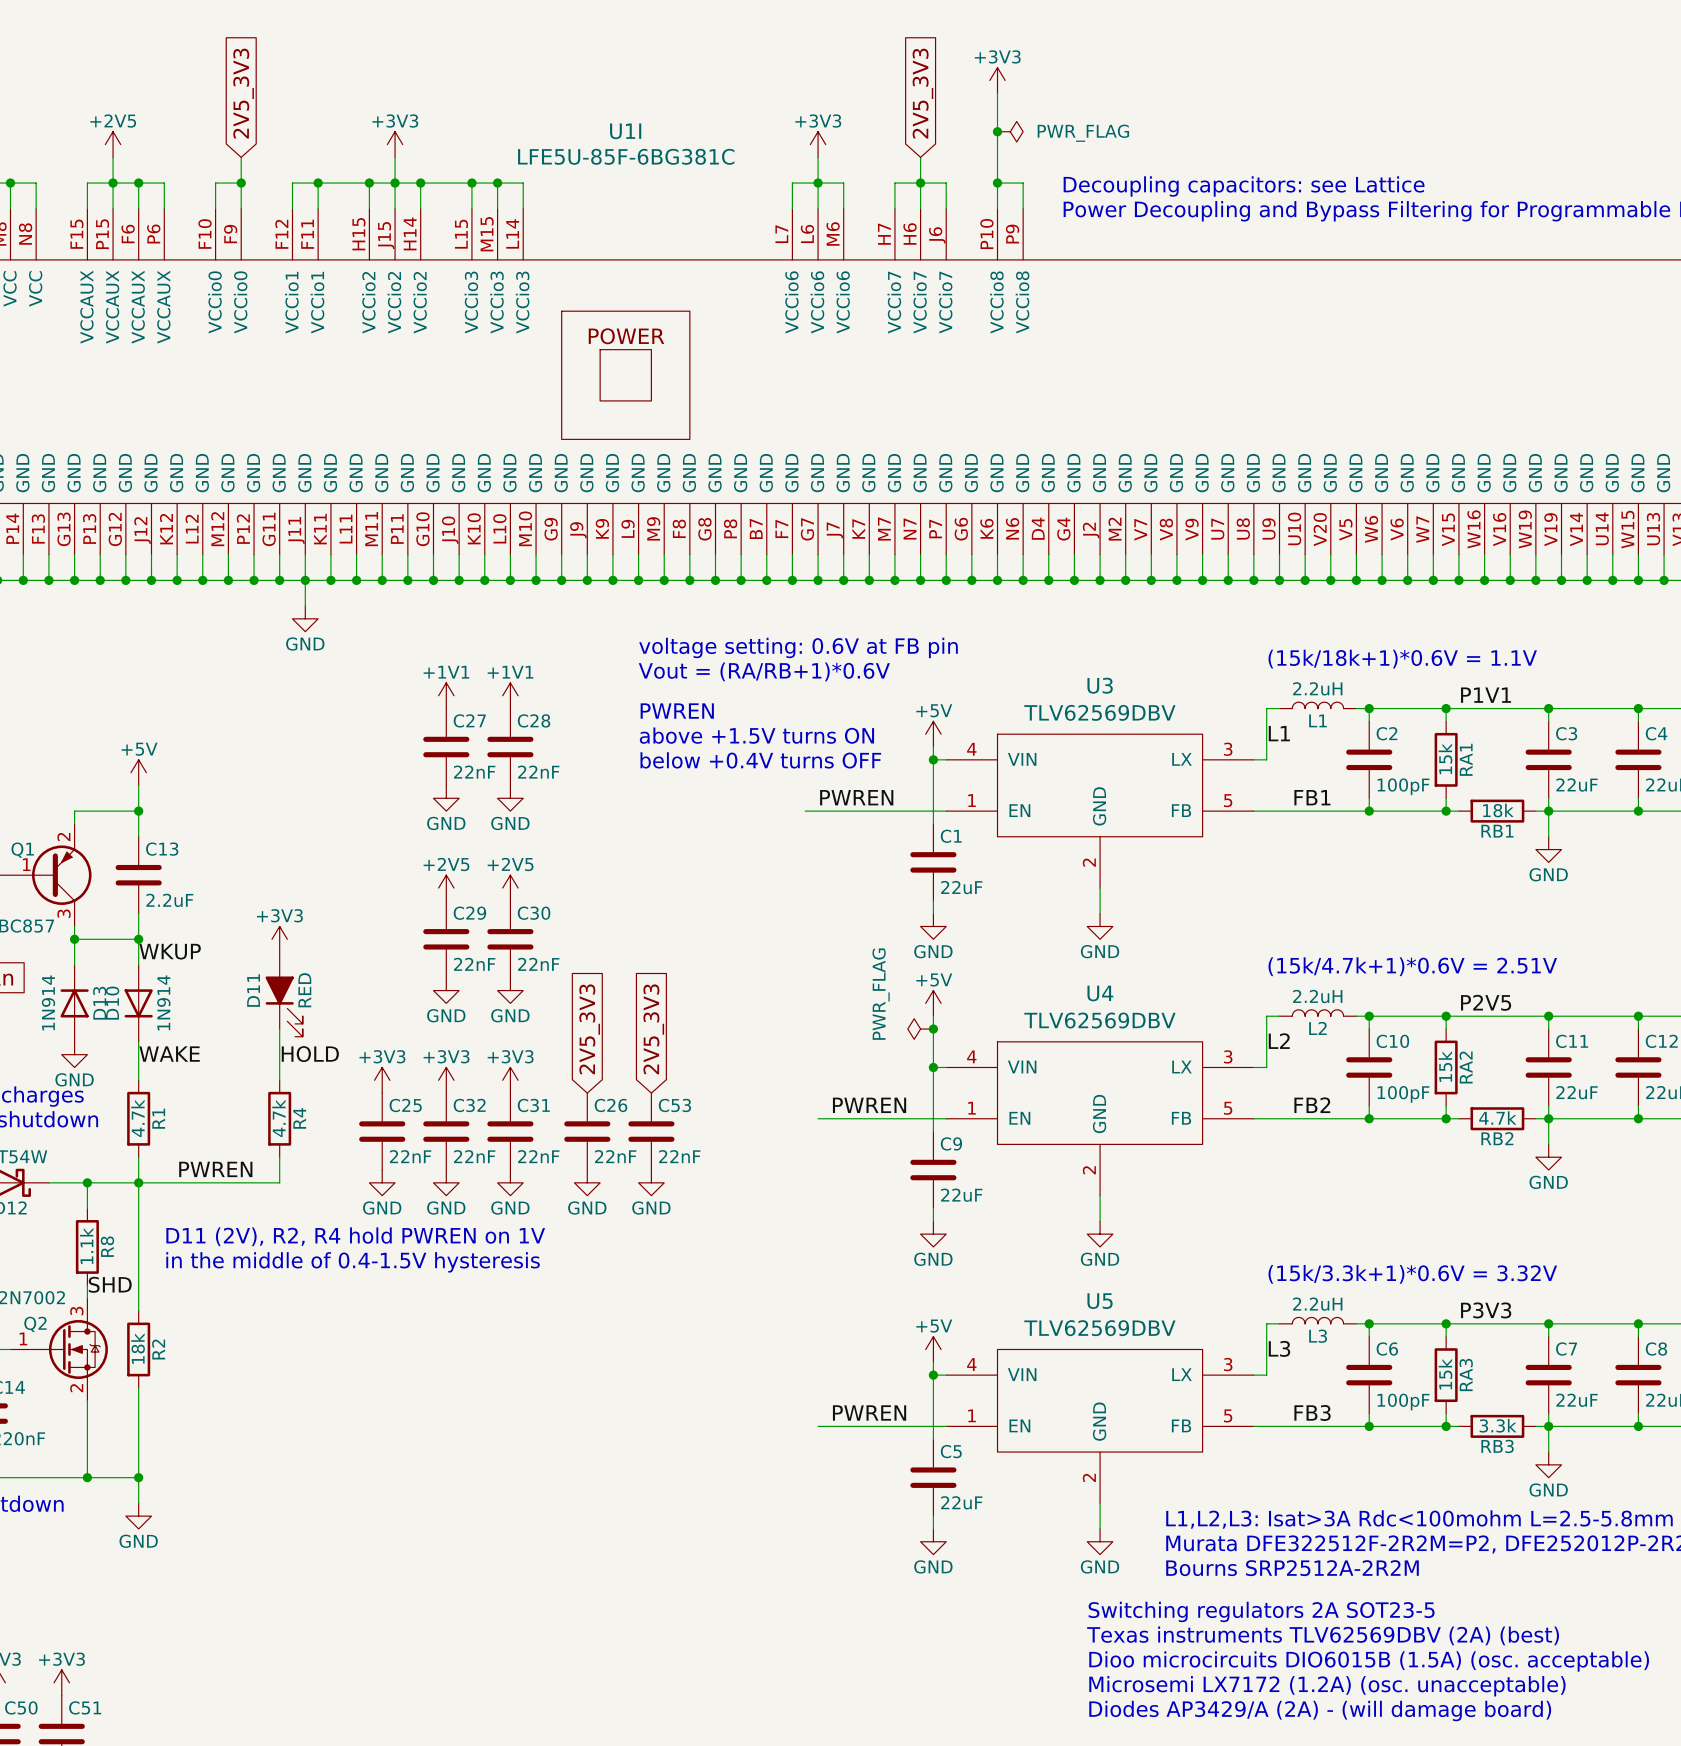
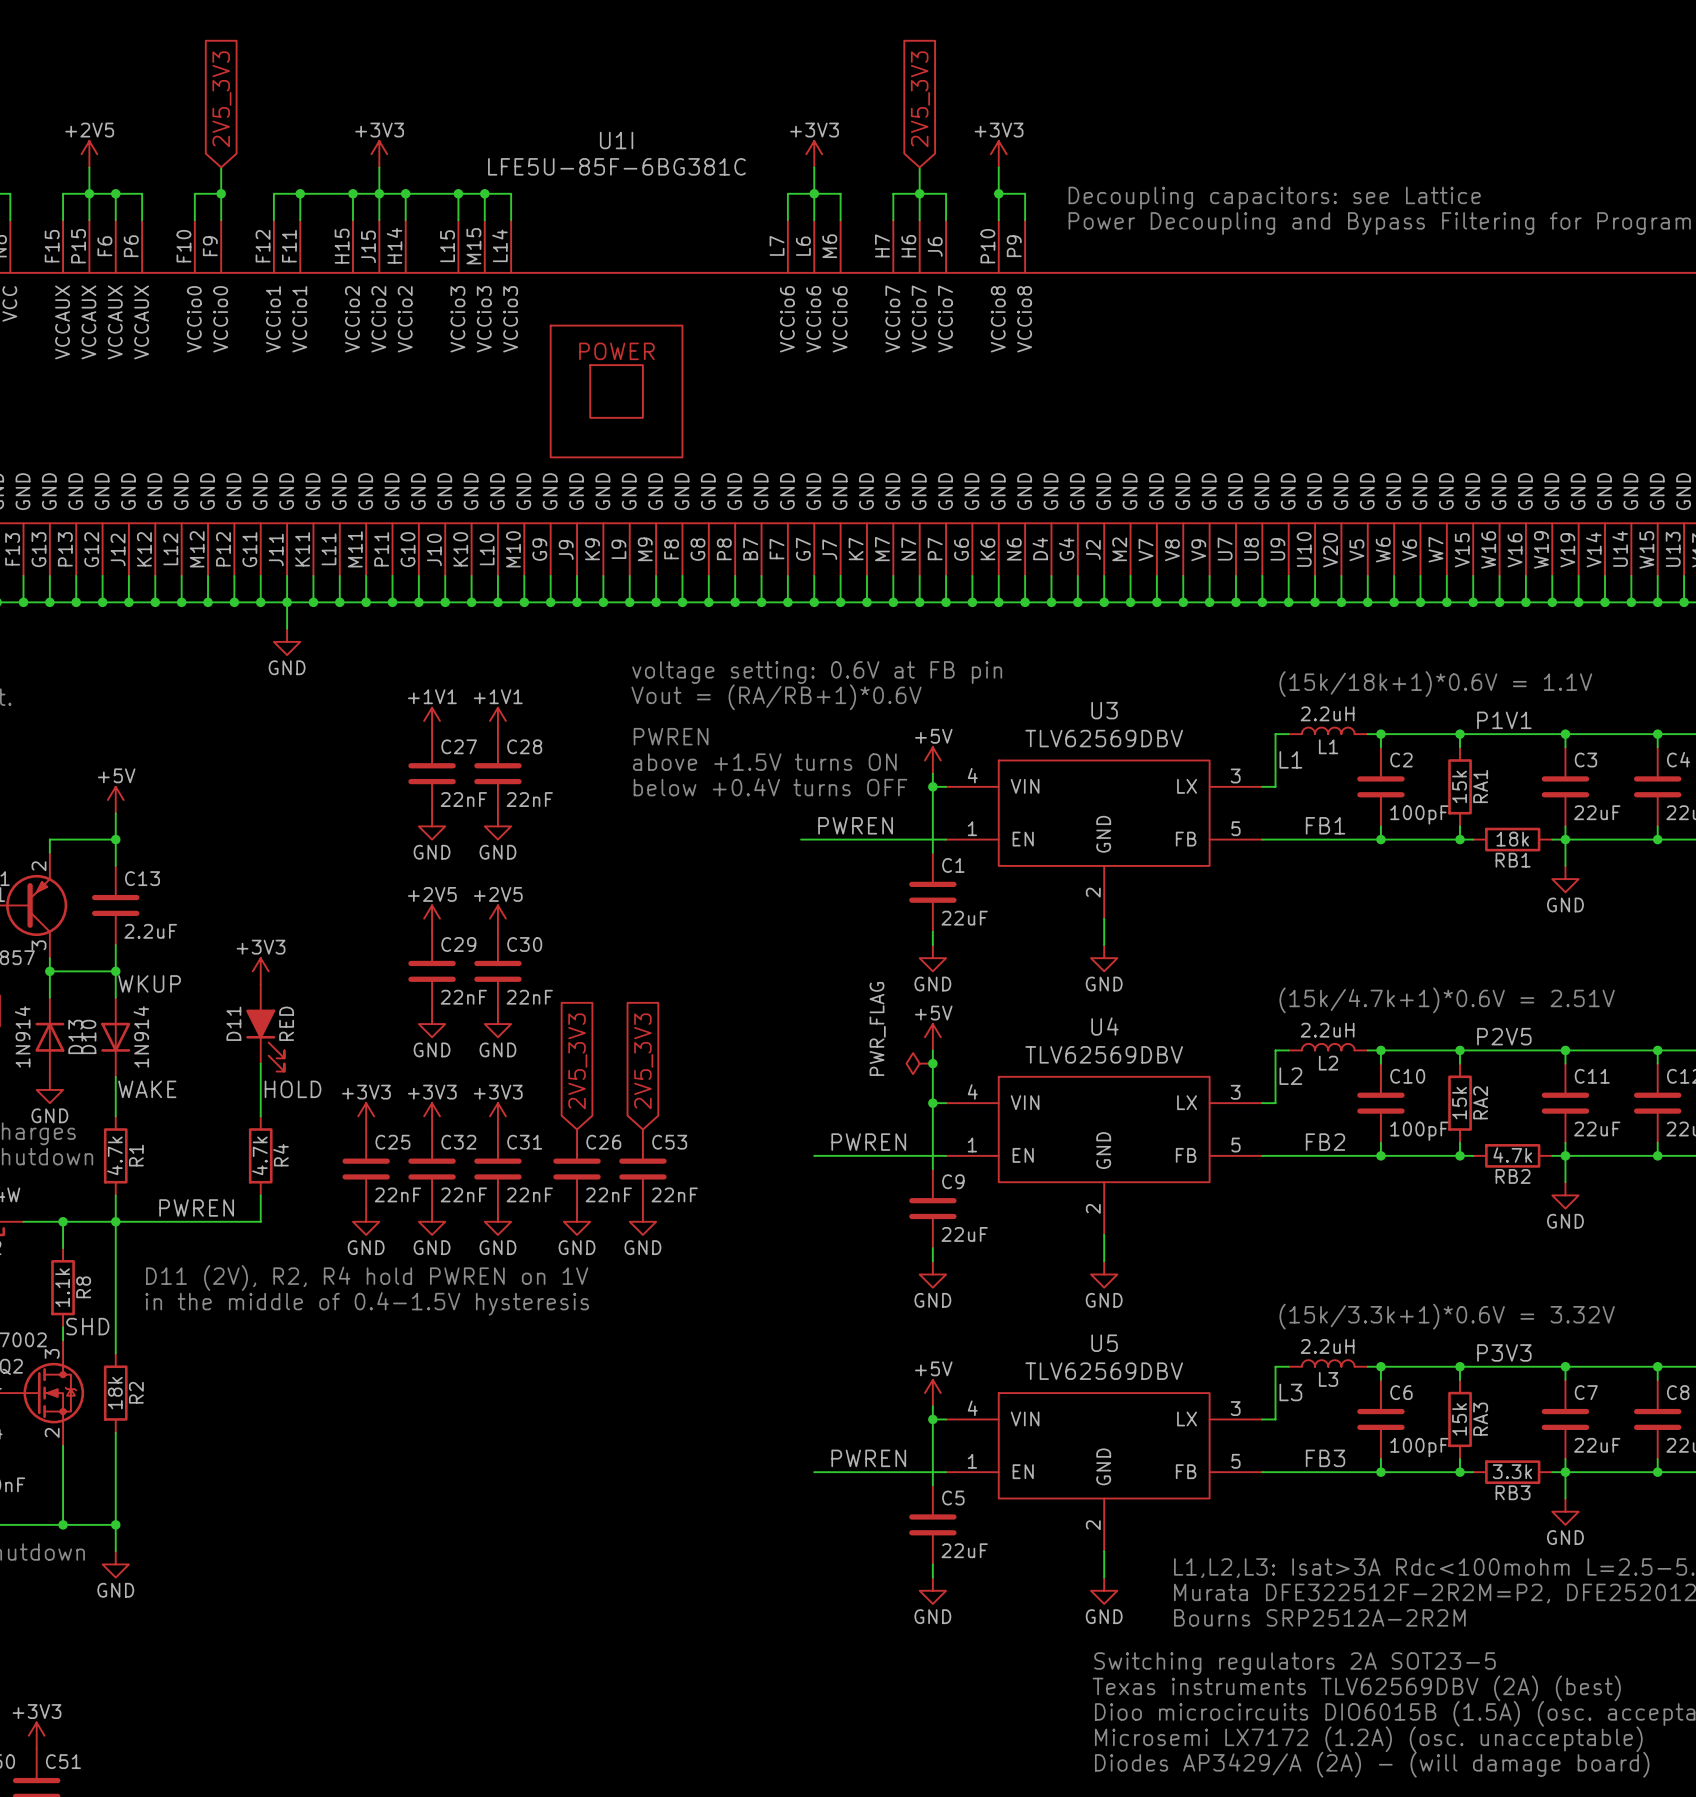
power symbol position: +3V3 (997, 80) -> +3V3 (998, 154)
wire: (997, 93) (997, 157) -> none
junction: (997, 131) -> none
power symbol: PWR_FLAG (1010, 131) -> none

